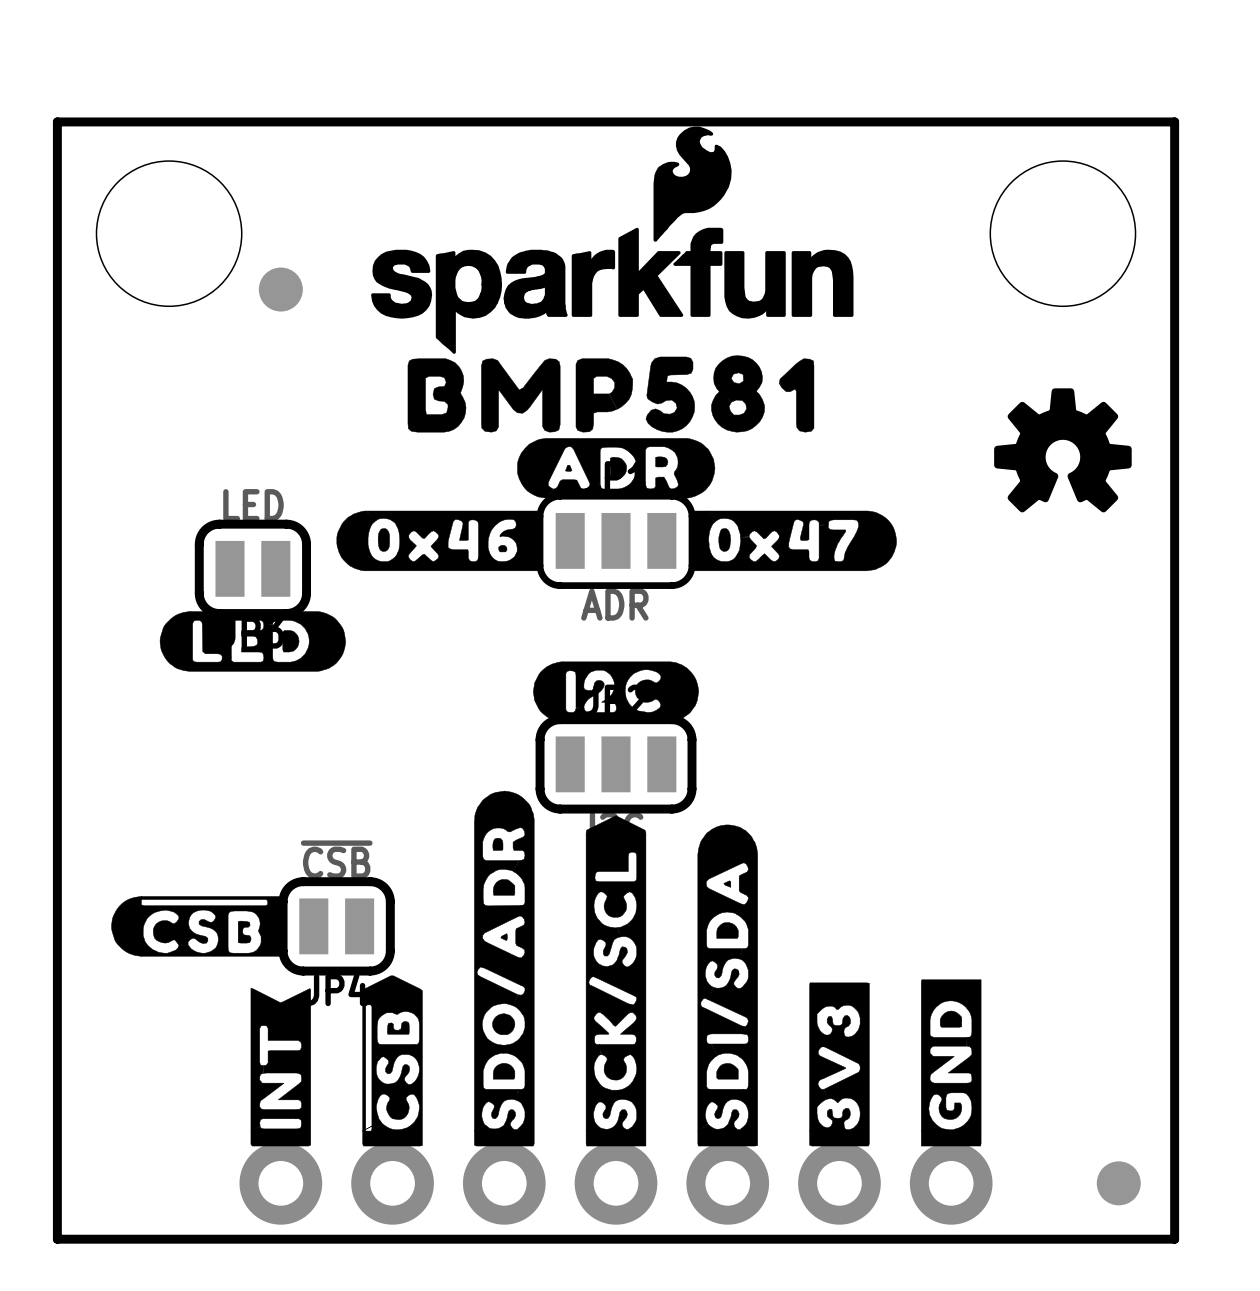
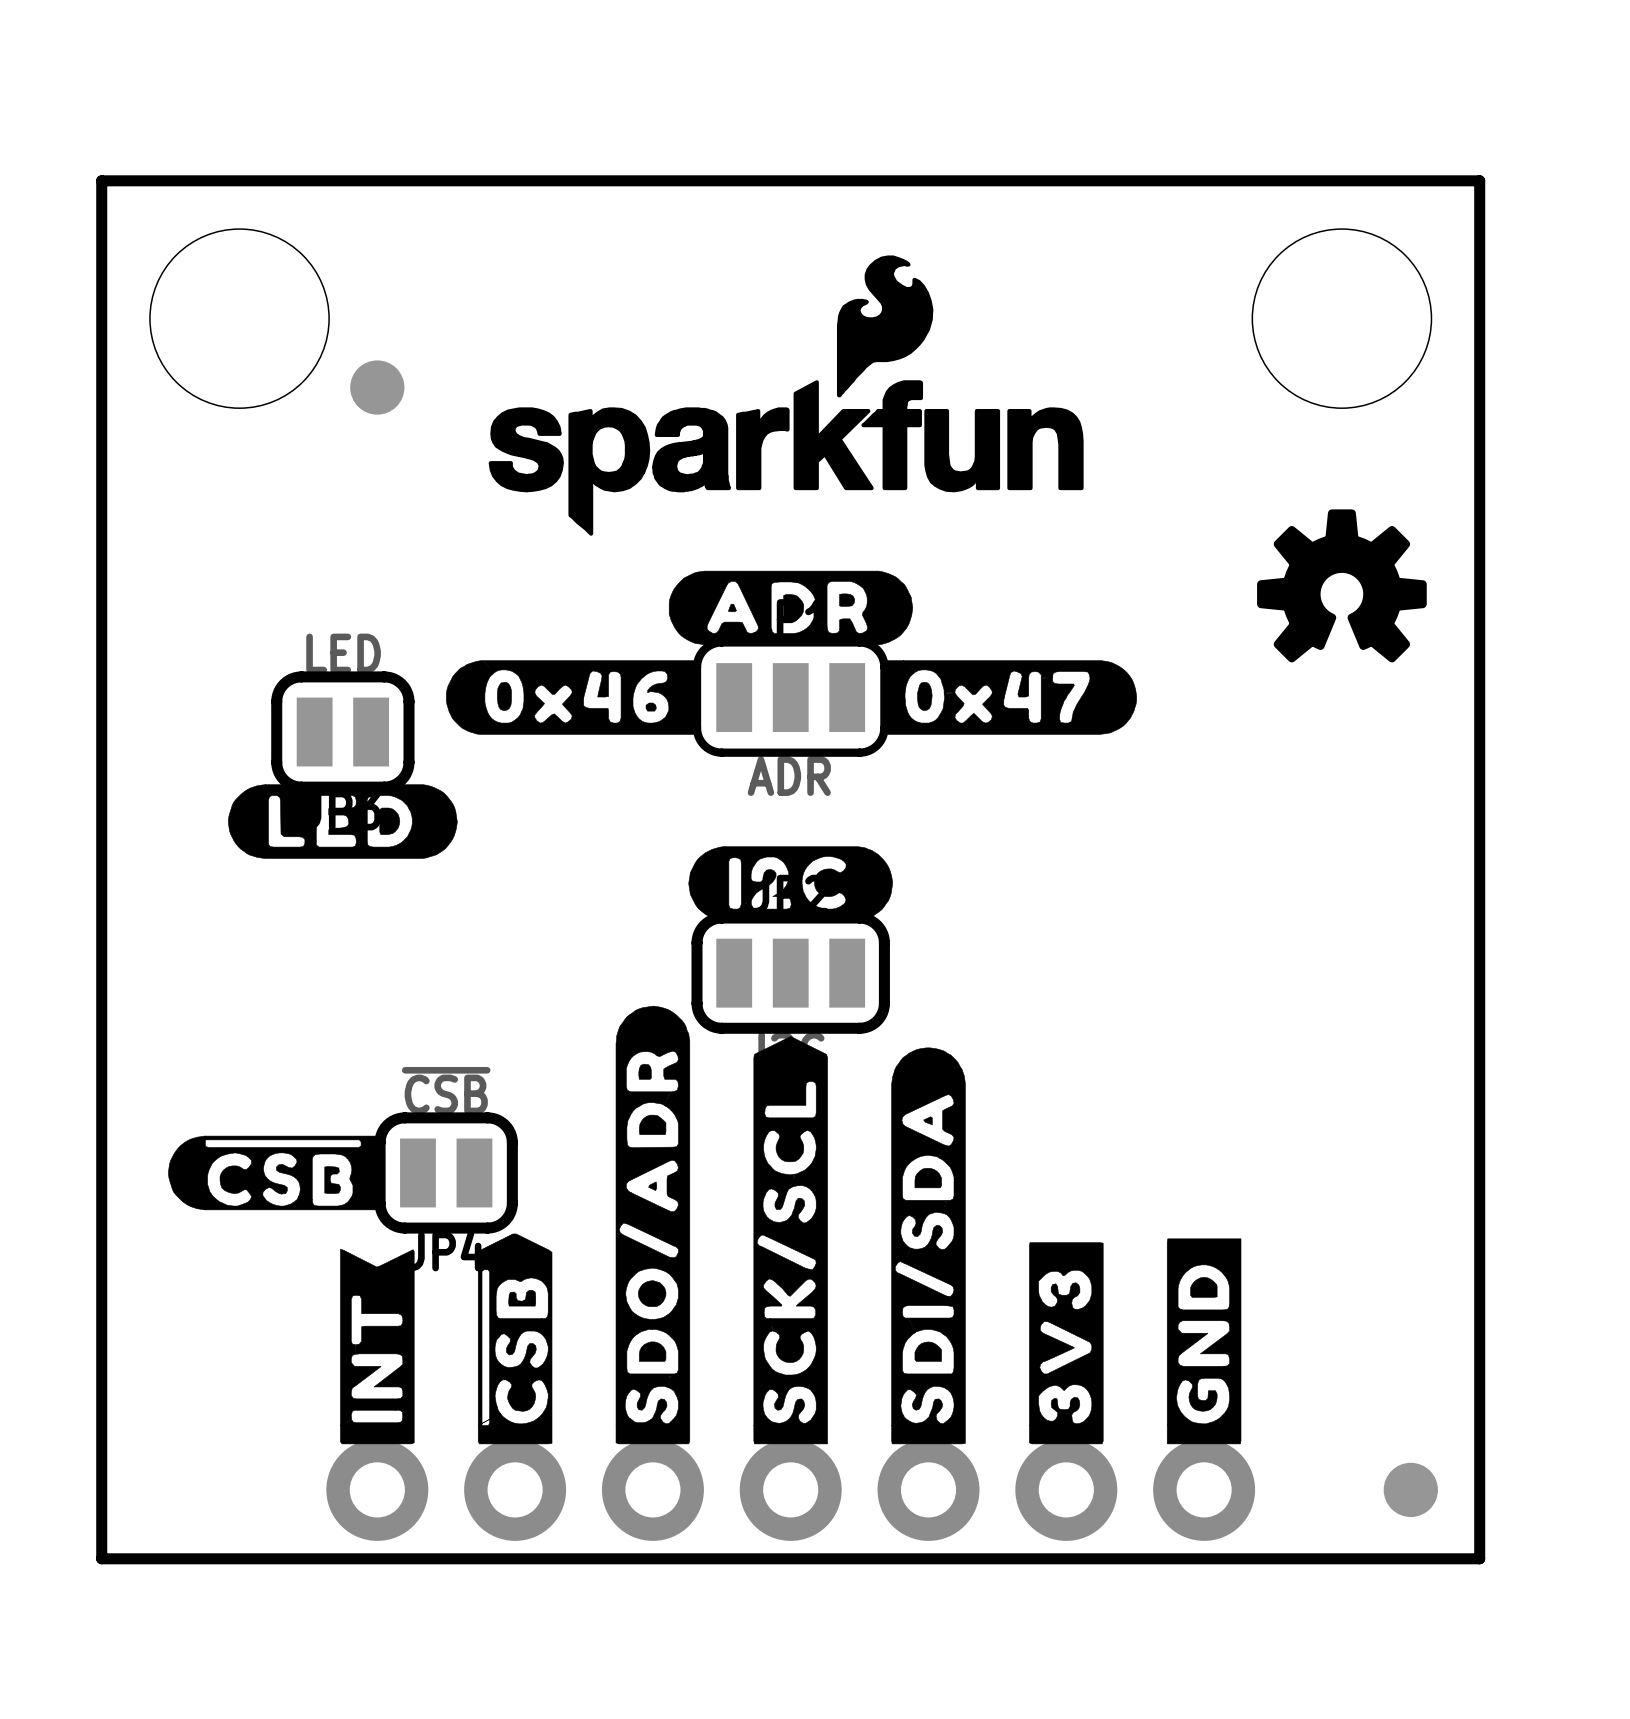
drawing position: (612, 240) -> (786, 395)
drawing: [407, 355, 815, 433] -> none

